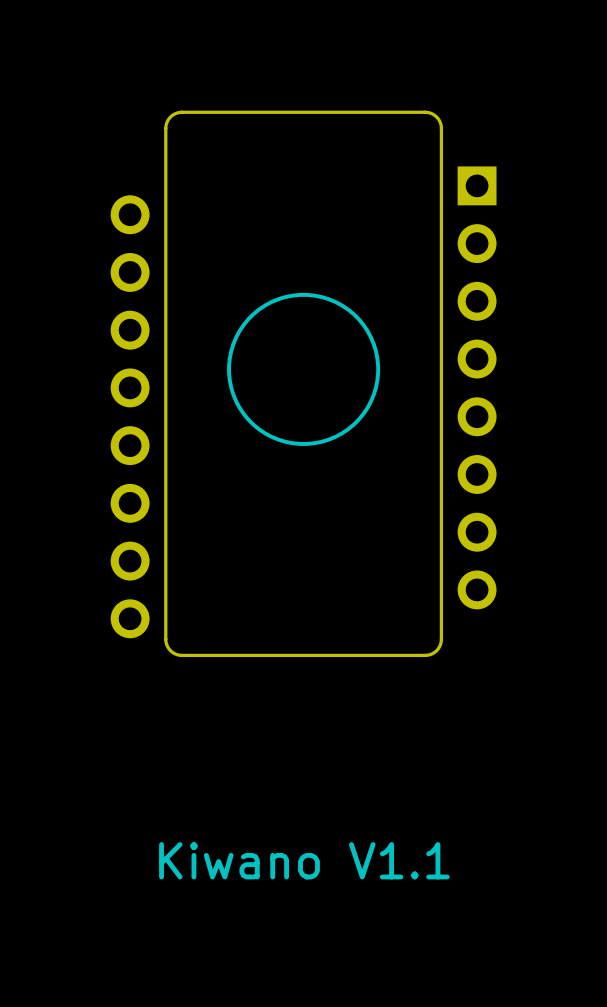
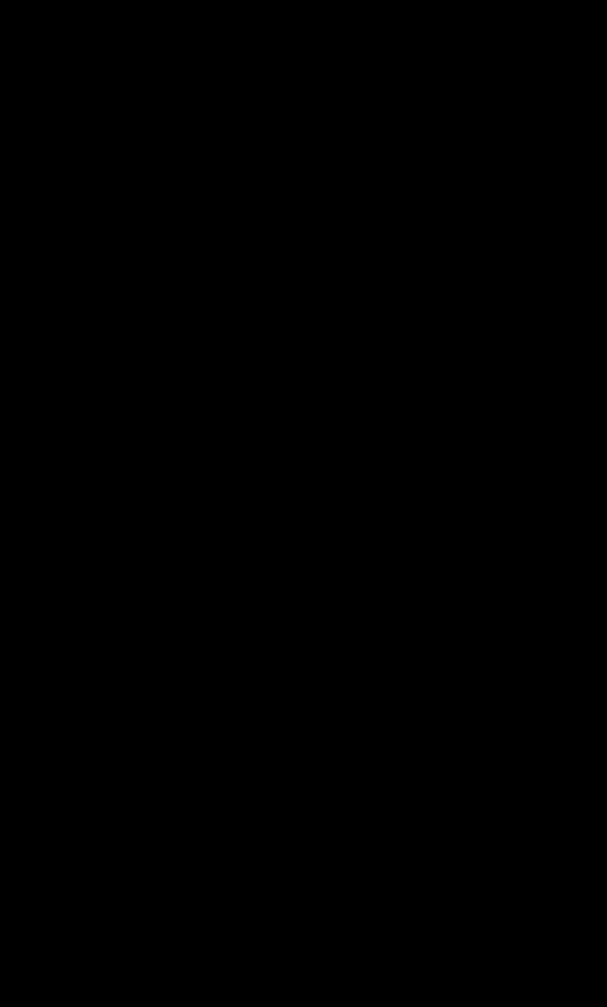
drawing: [227, 292, 381, 446] -> none
part: (303, 383) -> none
text: Kiwano V1.1 (304, 860) -> none

